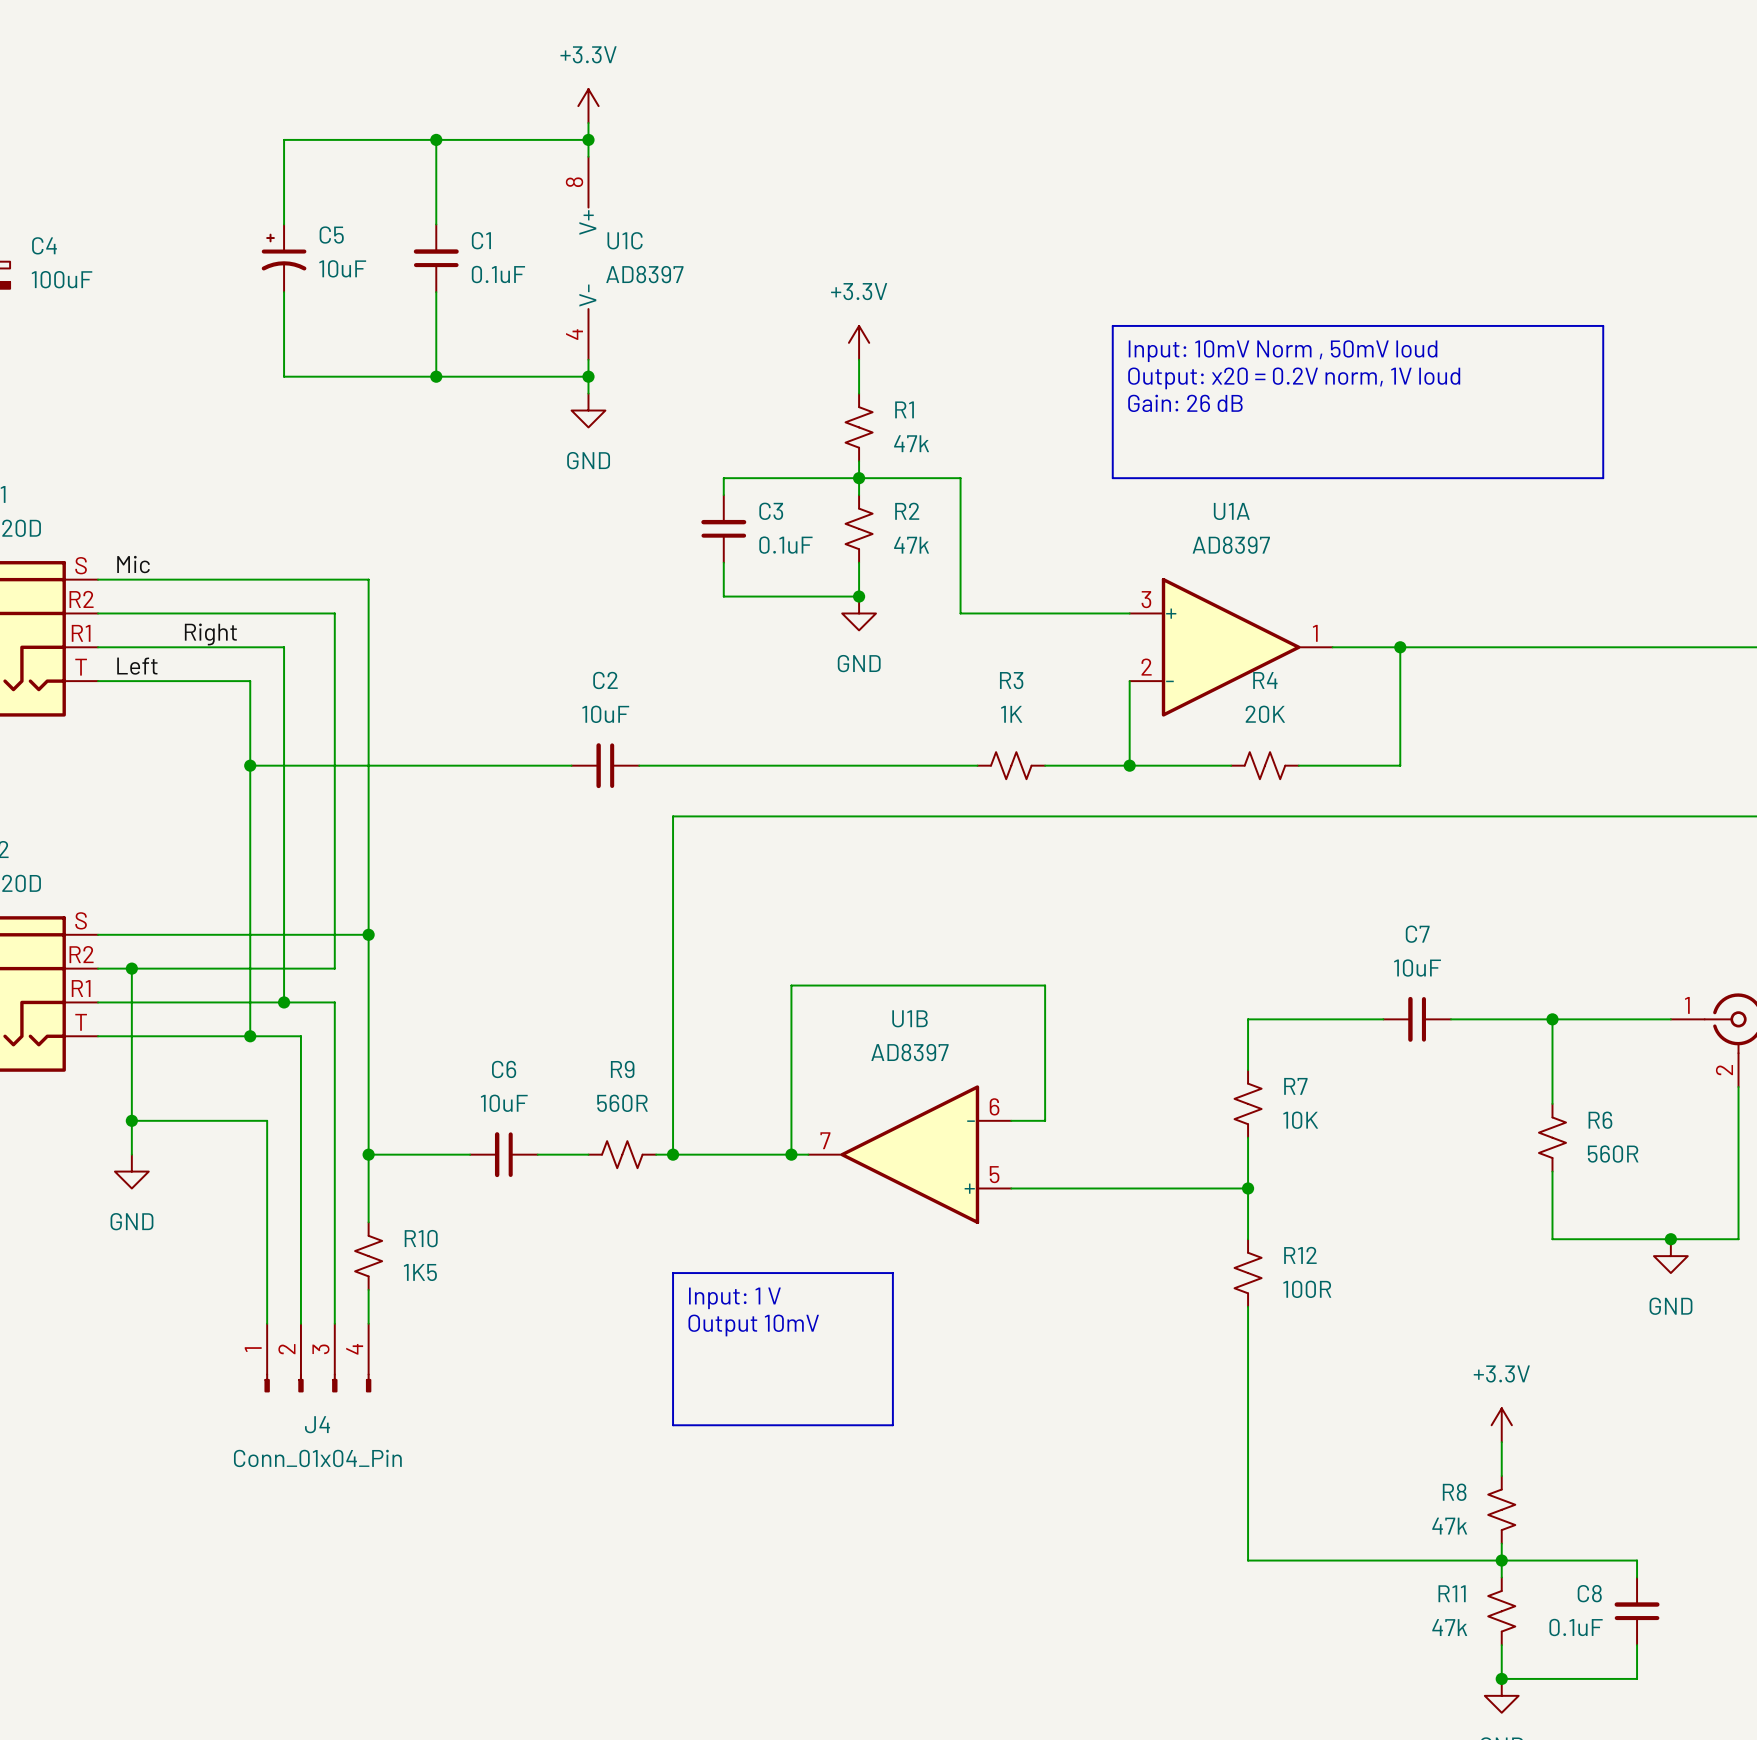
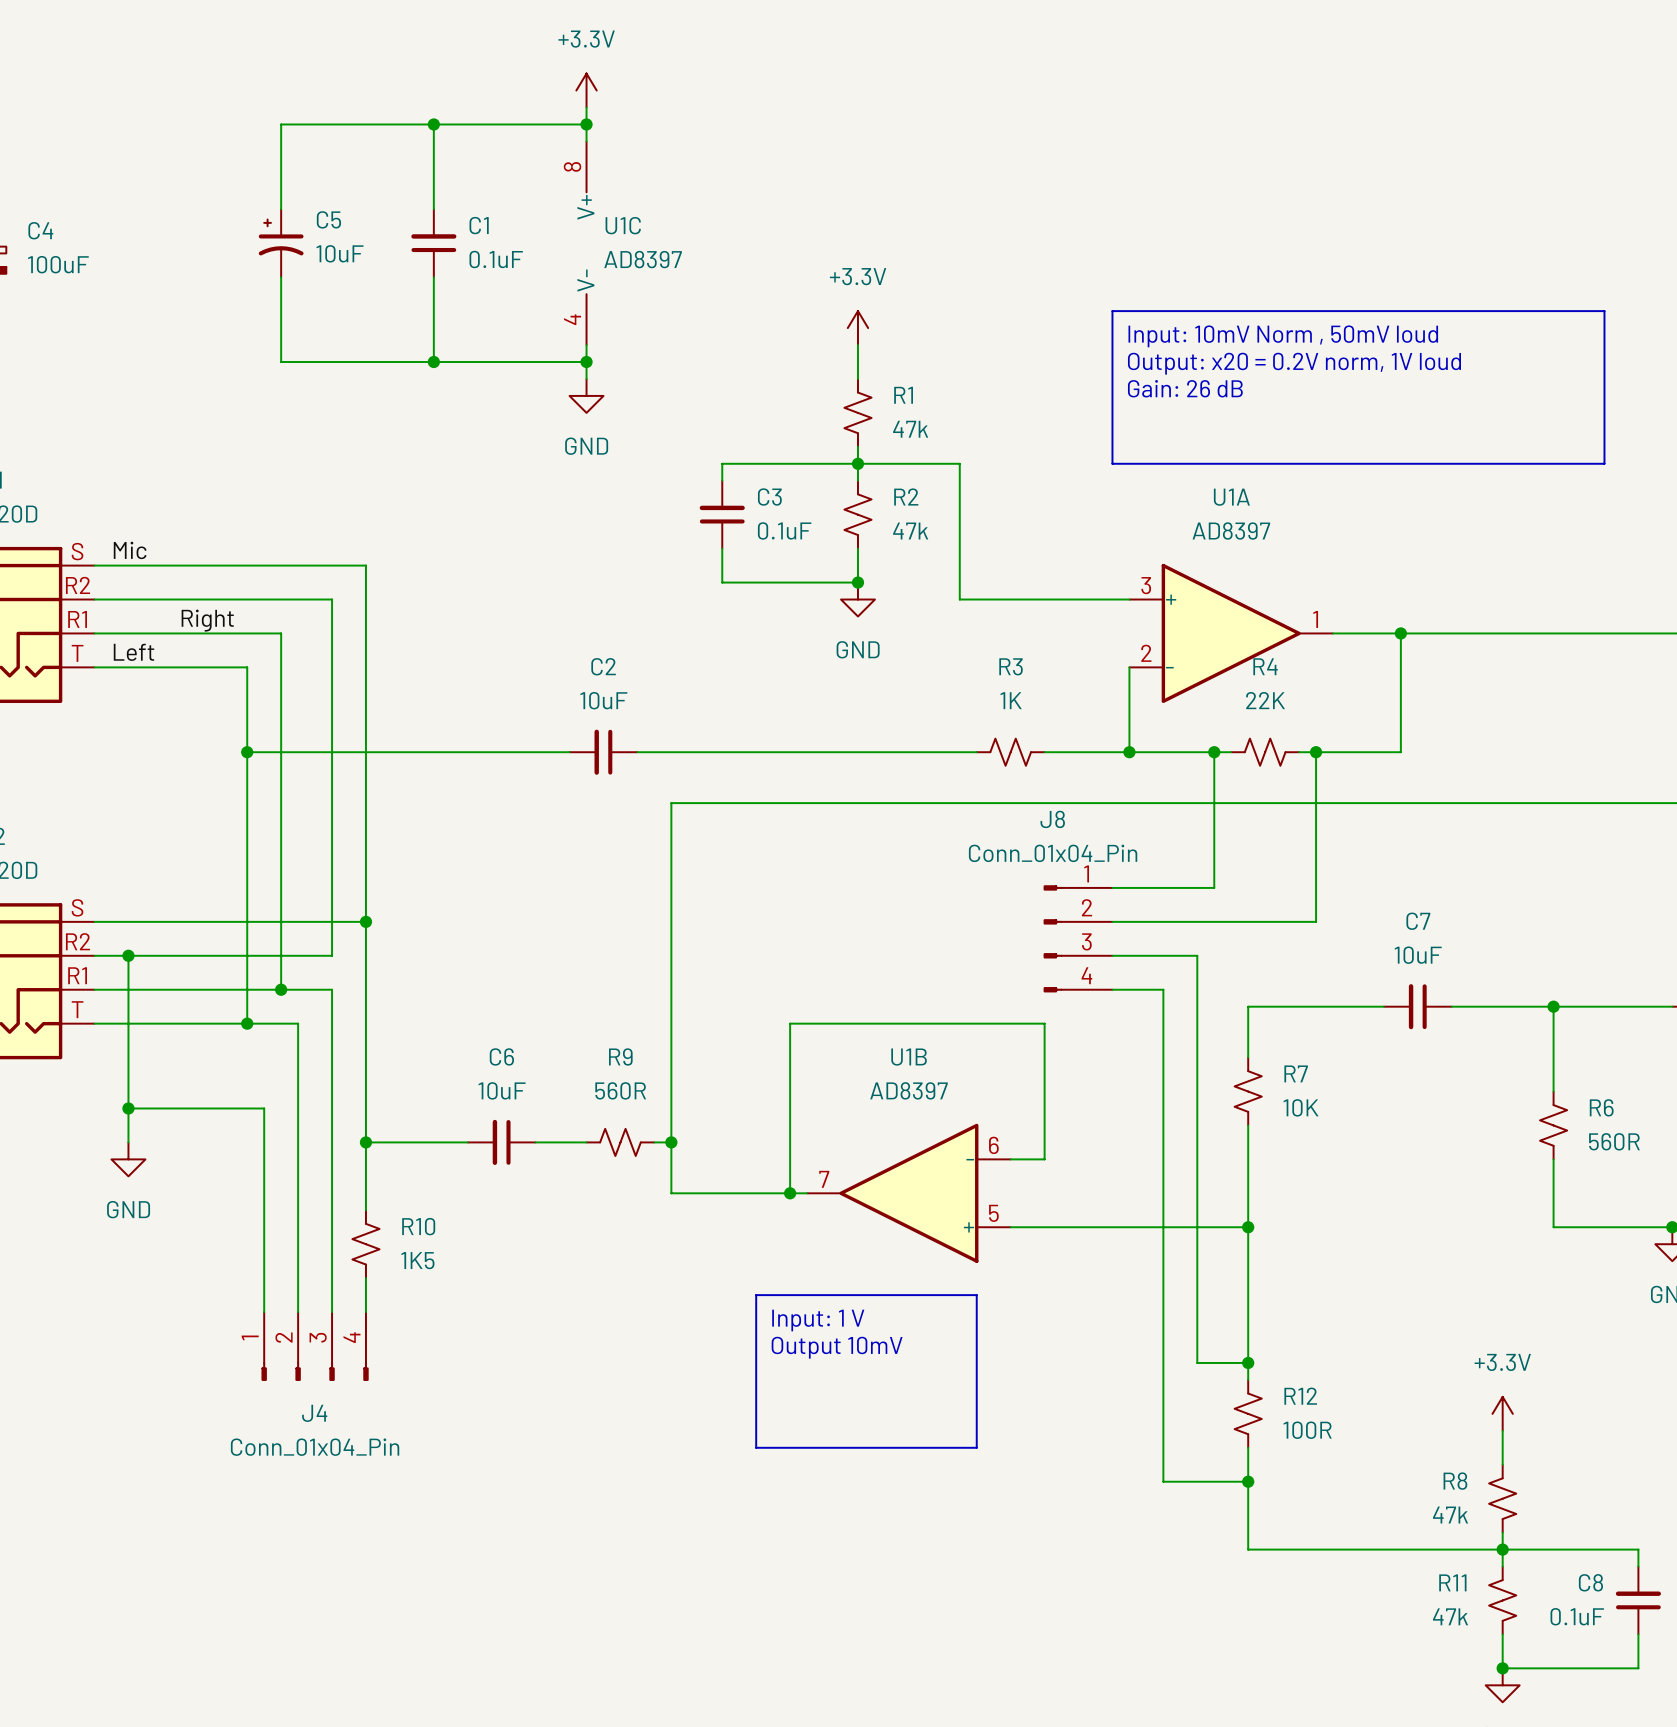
R4 value: 20K (1265, 714) -> 22K (1265, 700)
wire: none -> (1214, 752) (1214, 887) (1112, 887)
junction: none -> (1214, 752)
wire: none -> (1316, 752) (1316, 921) (1112, 921)
junction: none -> (1316, 752)
J8: none -> Conn_01x04_Pin (1078, 938)
wire: none -> (1112, 955) (1197, 955) (1197, 1362) (1248, 1362)
wire: none -> (1112, 989) (1163, 989) (1163, 1481) (1248, 1481)
wire: (791, 1036) (791, 985) (1045, 985) (1045, 1036) -> (790, 1023) (1044, 1023)
wire: (1011, 1120) (1045, 1120) -> (1010, 1159) (1044, 1159) (1044, 1108)
wire: (673, 1154) (808, 1154) -> (671, 1142) (671, 1193) (807, 1193)
wire: none -> (790, 1142) (790, 1193)
junction position: (791, 1154) -> (790, 1193)
U1B position: (909, 1154) -> (908, 1193)
wire: (1011, 1188) (1248, 1188) -> none
junction position: (1248, 1188) -> (1248, 1227)
wire: none -> (1010, 1227) (1248, 1227) (1248, 1295)
line: (673, 1273) (892, 1273) (892, 1425) (673, 1425) (673, 1273) -> (756, 1295) (976, 1295) (976, 1447) (756, 1447) (756, 1295)
R12 position: (1248, 1273) -> (1248, 1413)
text position: Input: 1 V (734, 1298) -> Input: 1 V (818, 1320)
text position: Output 10mV (753, 1325) -> Output 10mV (837, 1347)
junction: none -> (1248, 1362)
junction: none -> (1248, 1481)

